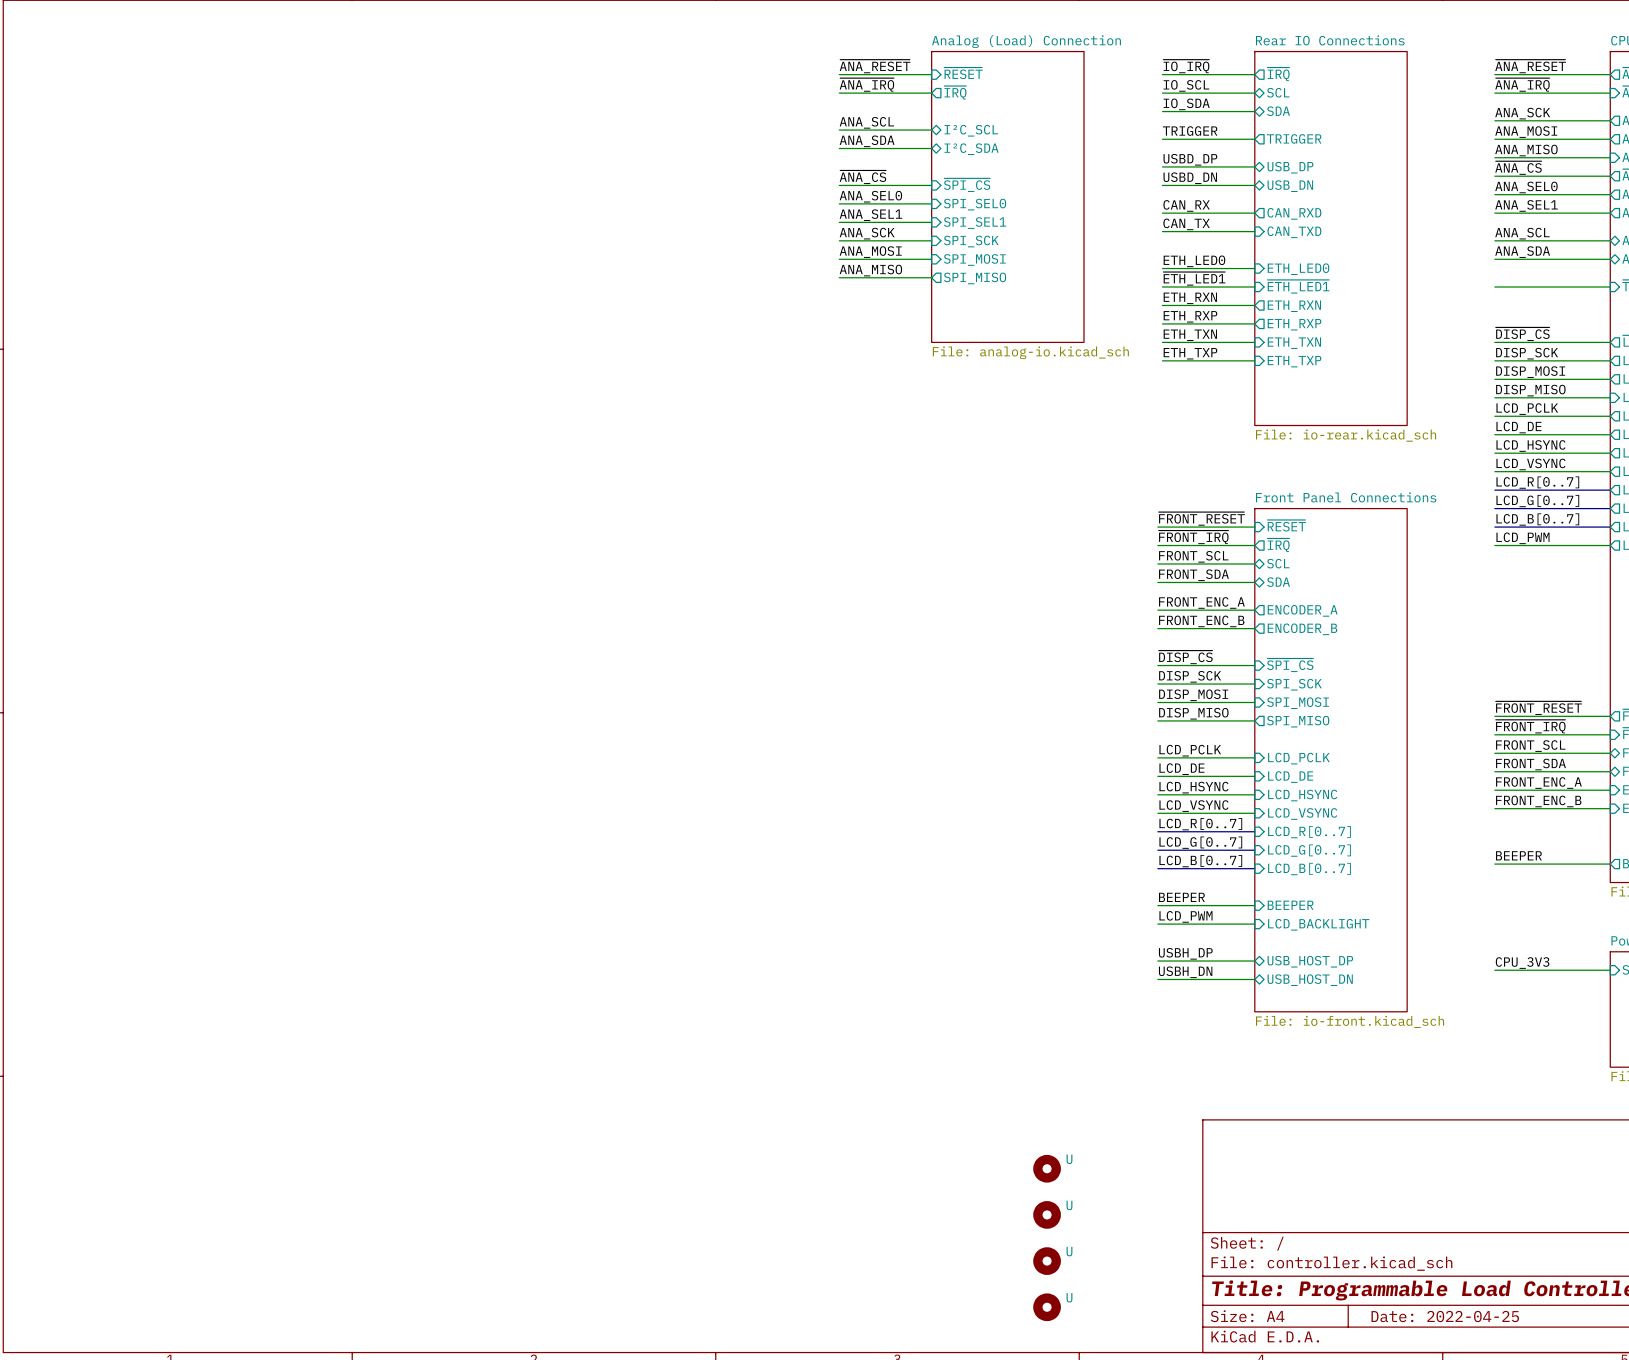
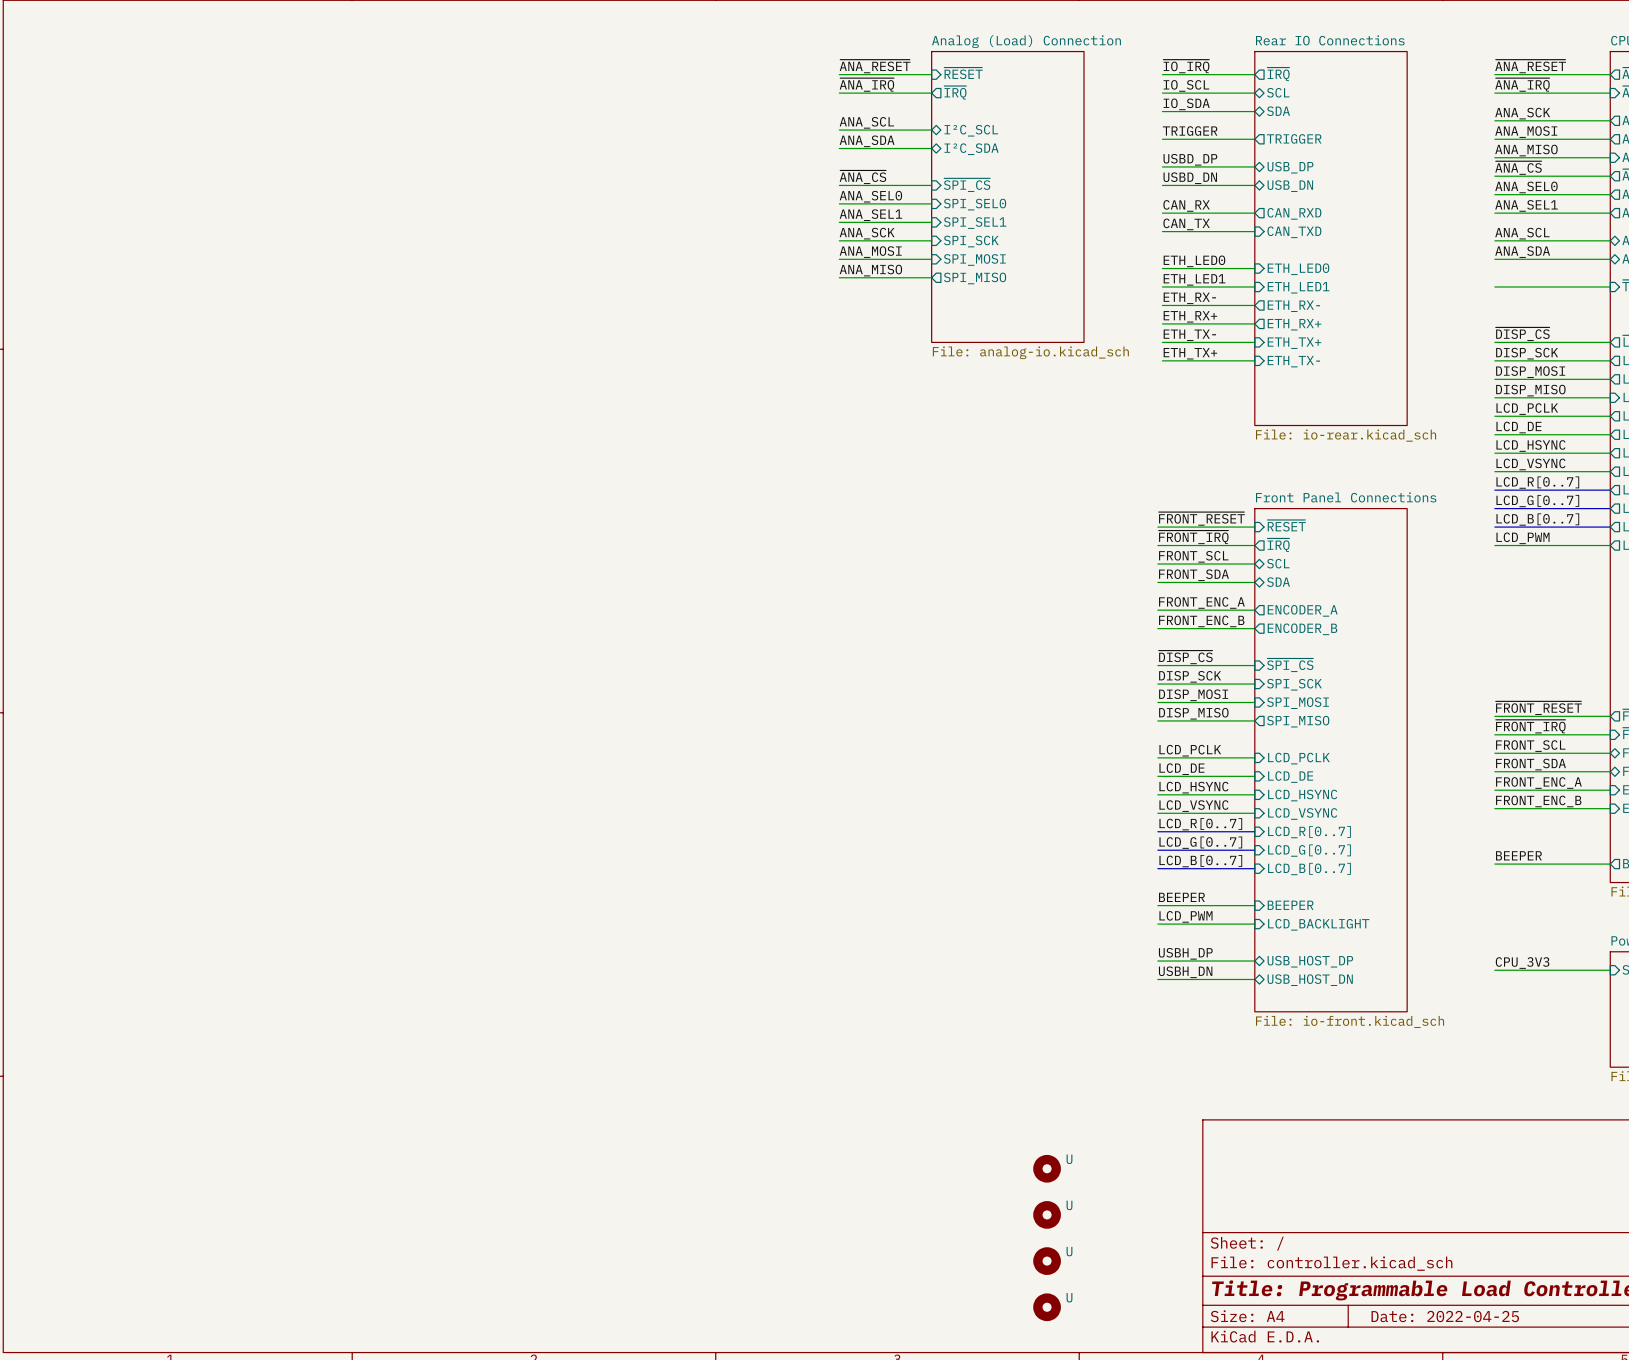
label: ~{ETH_LED1} (1194, 278) -> ETH_LED1 (1194, 279)
sheet pin: ~{ETH_LED1} (1298, 286) -> ETH_LED1 (1298, 287)
label: ETH_RXN (1190, 298) -> ETH_RX- (1189, 298)
sheet pin: ETH_RXN (1294, 306) -> ETH_RX- (1293, 306)
label: ETH_RXP (1190, 316) -> ETH_RX+ (1190, 316)
sheet pin: ETH_RXP (1294, 324) -> ETH_RX+ (1294, 324)
label: ETH_TXN (1190, 335) -> ETH_TX- (1189, 335)
sheet pin: ETH_TXN (1294, 343) -> ETH_TX+ (1294, 343)
label: ETH_TXP (1190, 353) -> ETH_TX+ (1190, 353)
sheet pin: ETH_TXP (1294, 361) -> ETH_TX- (1293, 361)

